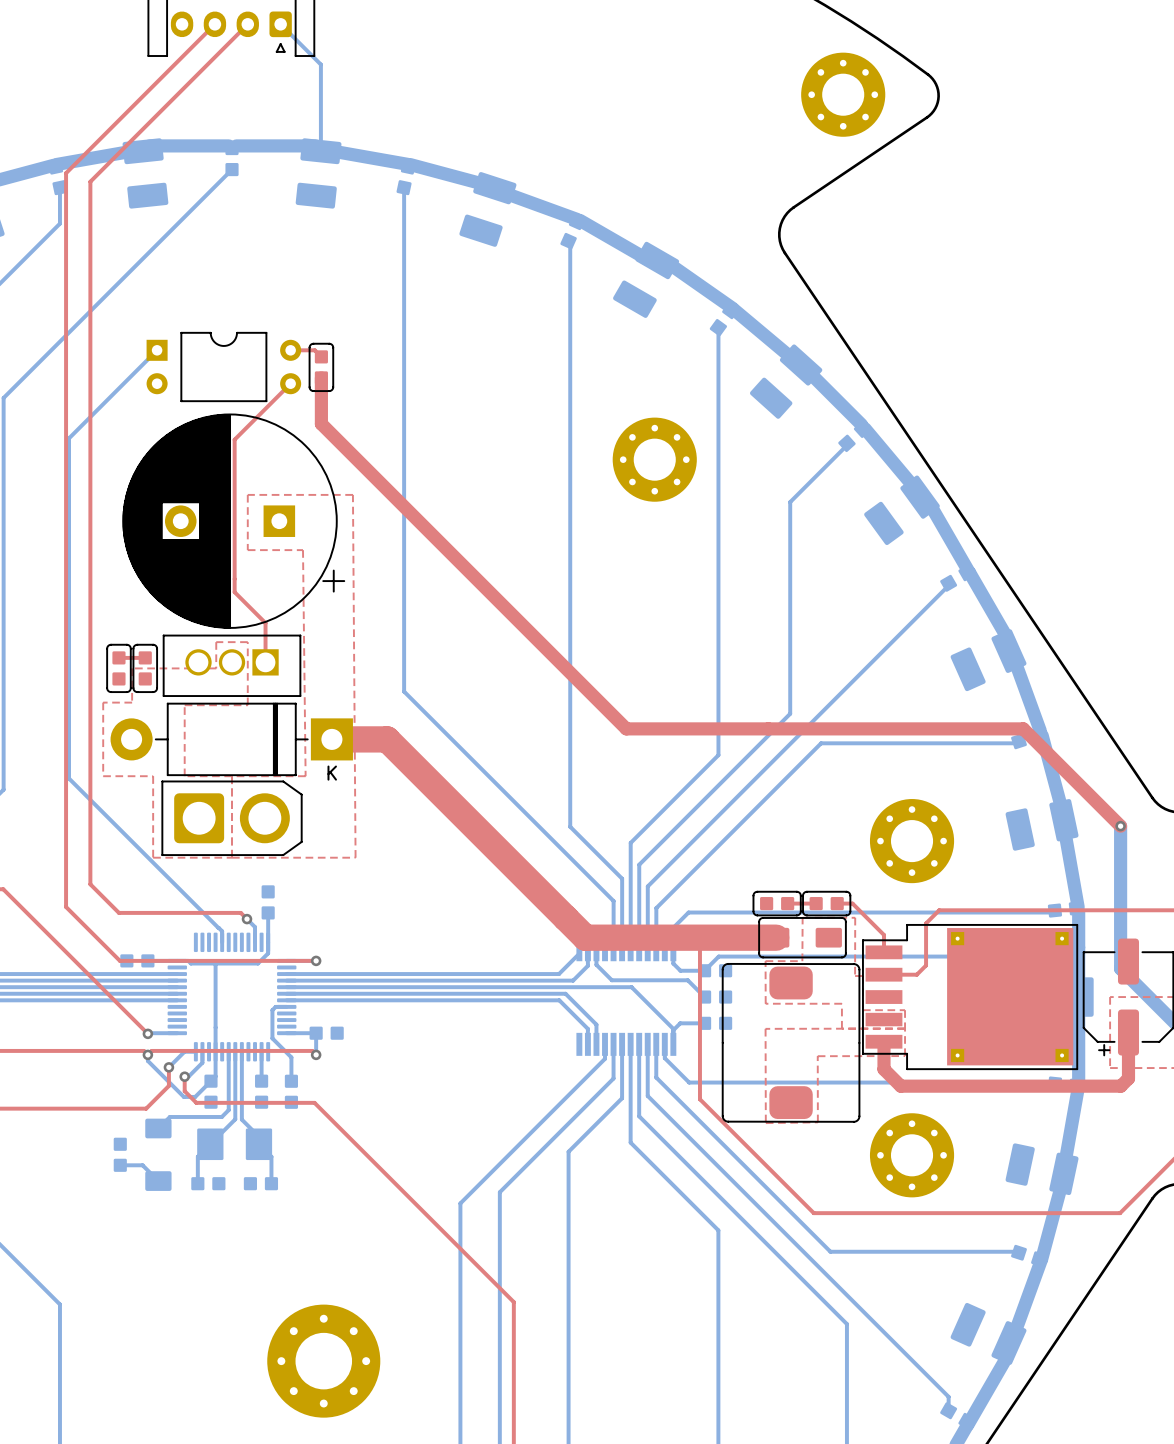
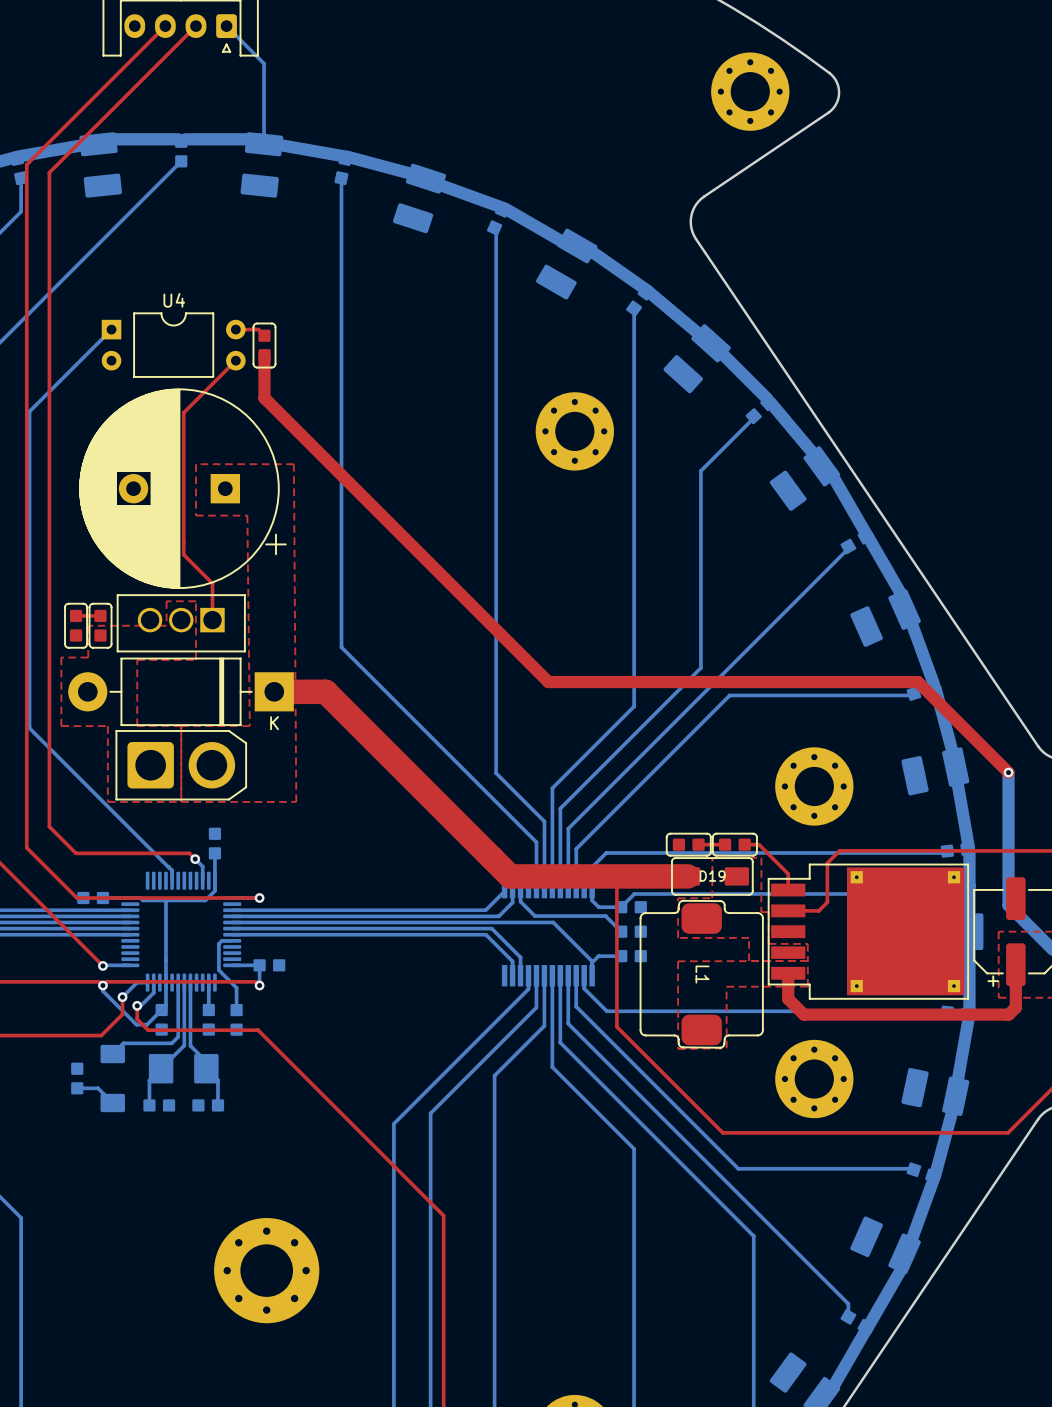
U4 name: none -> U4 (174, 300)
D19 name: none -> D19 (712, 876)
part: (791, 1042) -> none
L1: none -> (701, 974)

